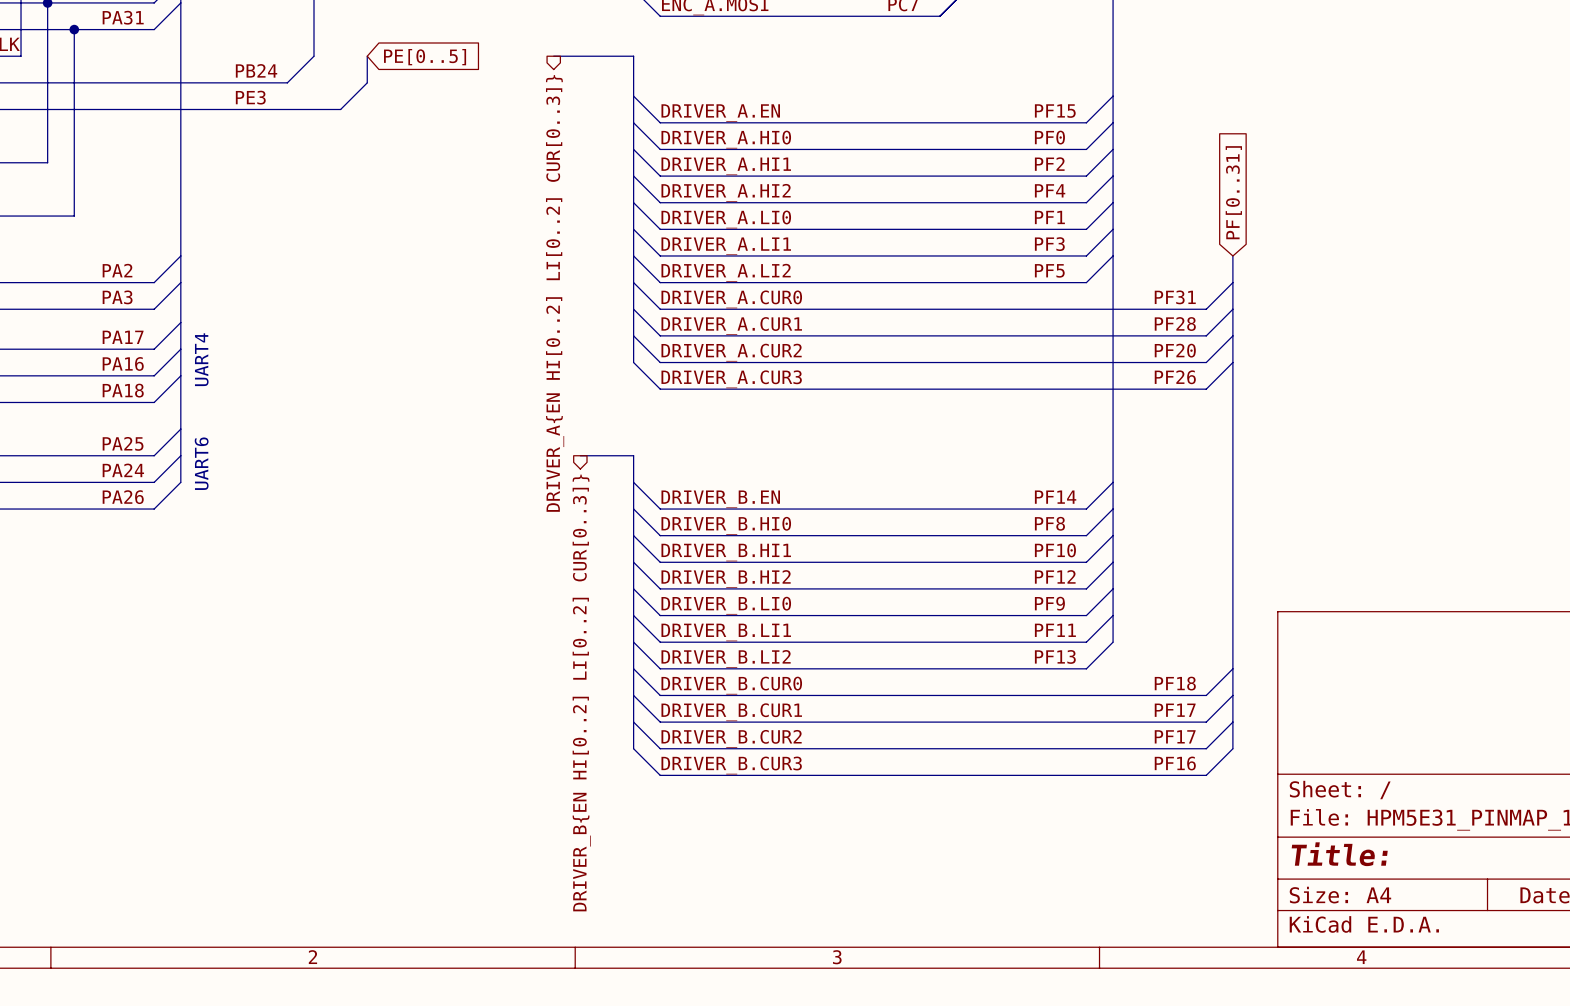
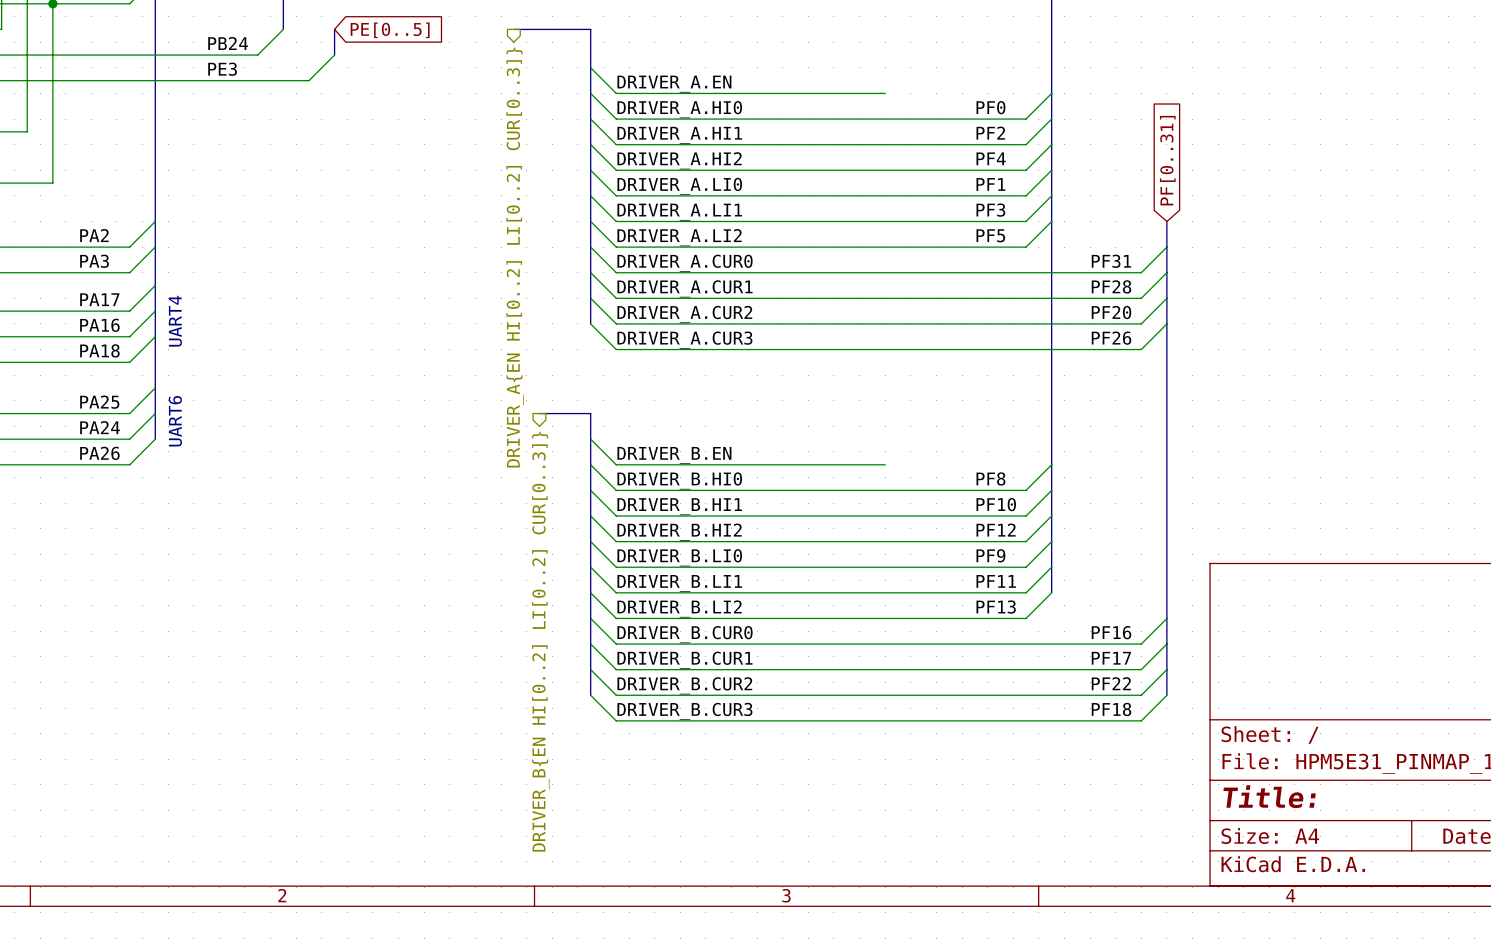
wire: (1113, 96) (1086, 122) (939, 122) -> none
label: PF15 (1055, 111) -> none
wire: (1113, 482) (1086, 509) (939, 509) -> none
label: PF14 (1055, 497) -> none
label: PF18 (1175, 683) -> PF16 (1111, 632)
label: PF17 (1175, 736) -> PF22 (1111, 683)
label: PF16 (1175, 763) -> PF18 (1111, 709)

